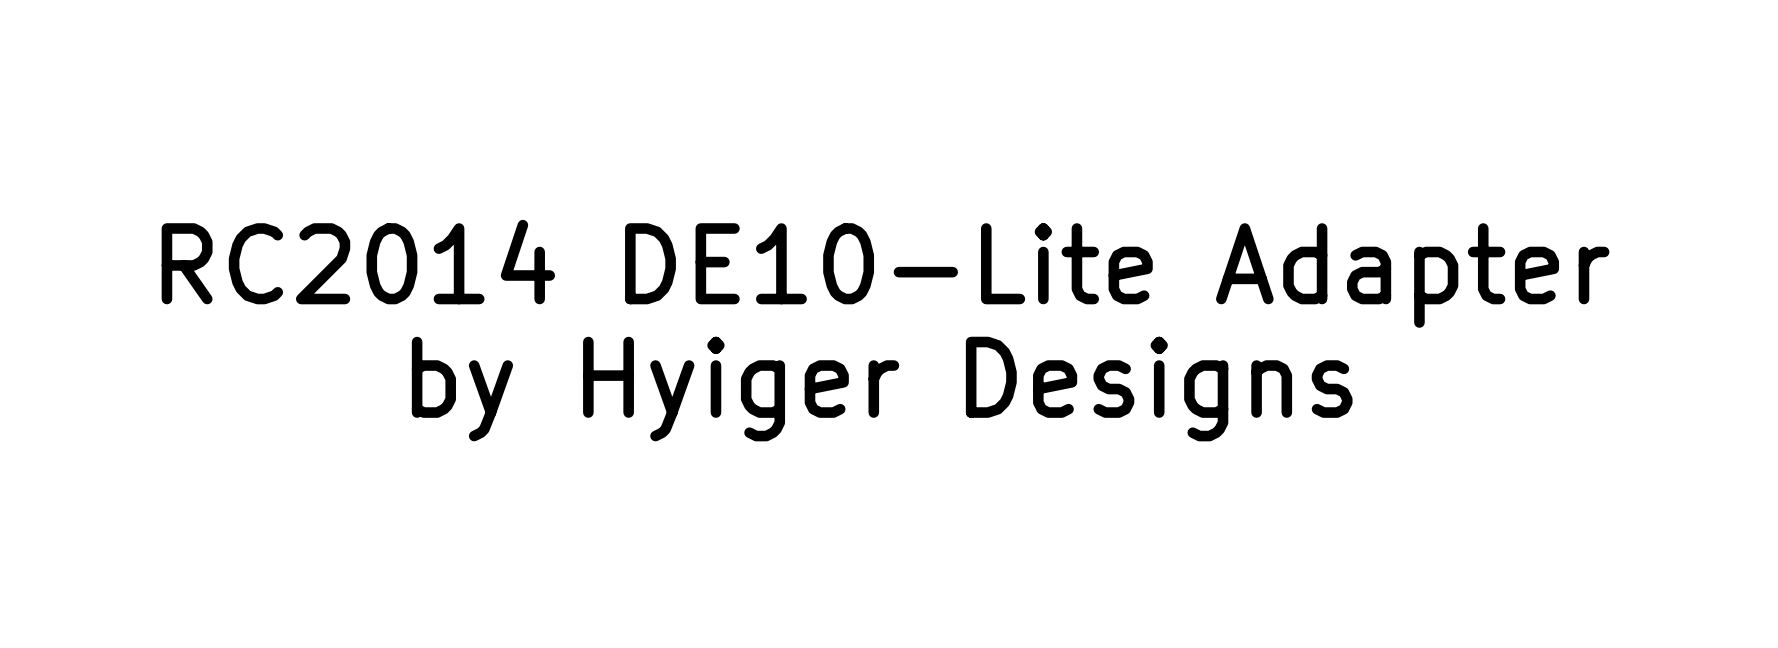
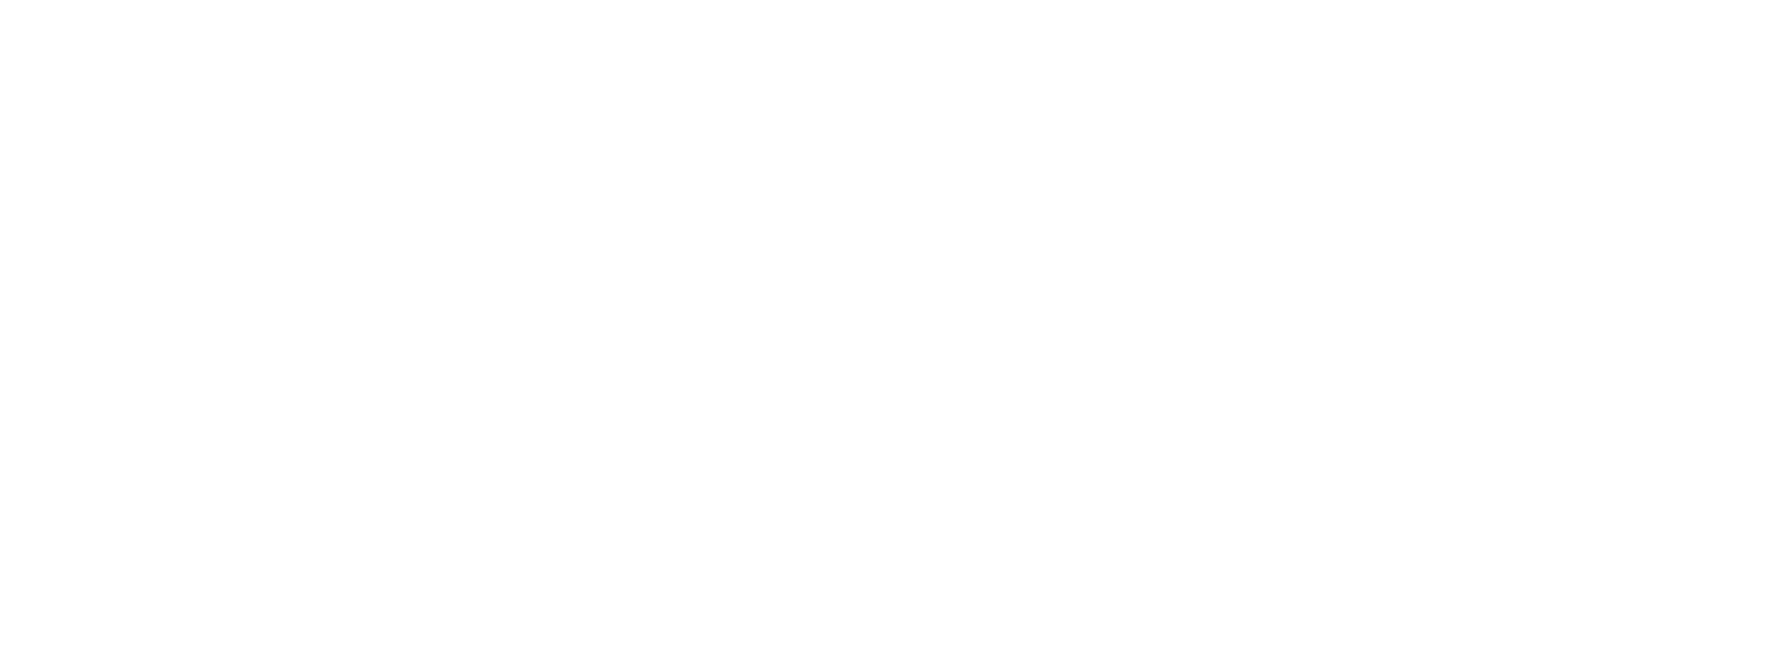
text: RC2014 DE10-Lite Adapter (885, 273) -> none
text: by Hyiger Designs (882, 389) -> none

